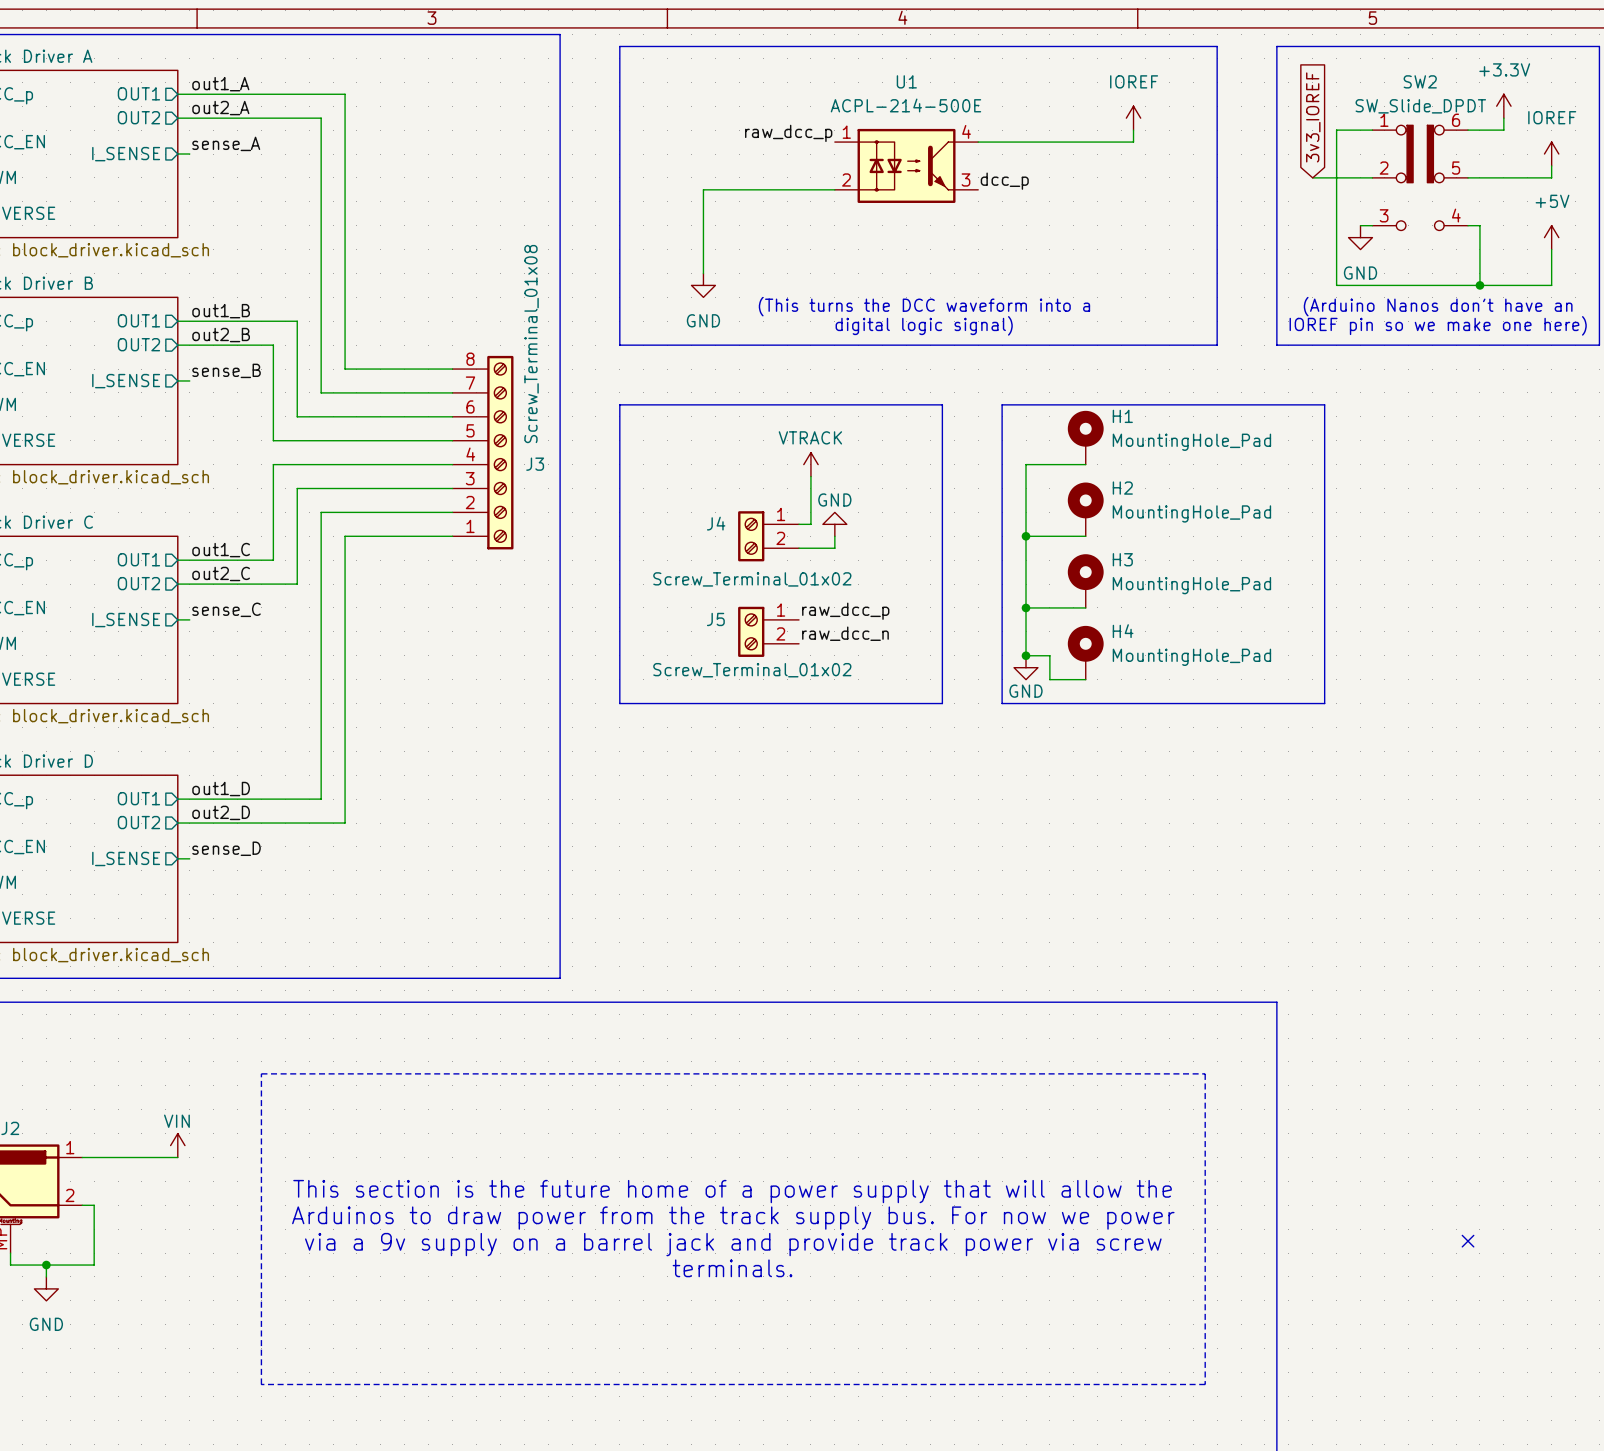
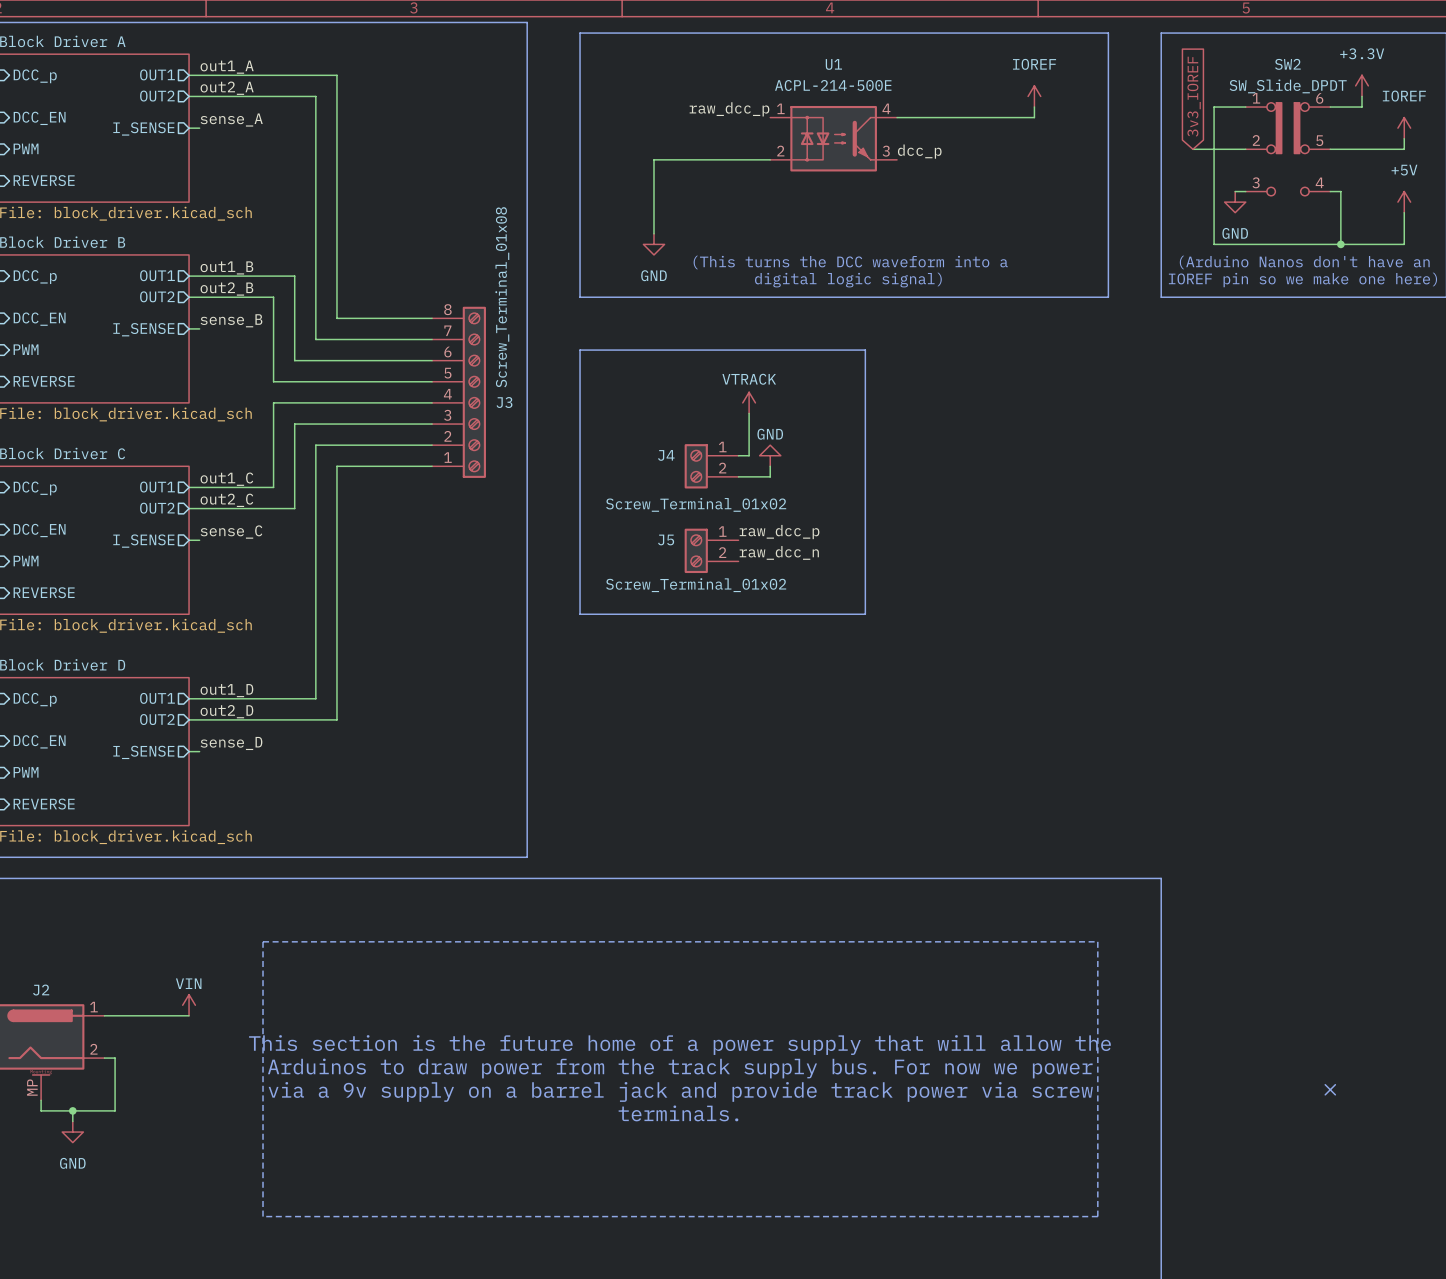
line: (1002, 404) (1324, 404) (1324, 703) (1002, 703) (1002, 404) -> none
H1: MountingHole_Pad (1085, 437) -> none
wire: (1085, 464) (1026, 464) (1026, 655) (1049, 655) (1049, 679) (1085, 679) -> none
H2: MountingHole_Pad (1085, 509) -> none
wire: (1026, 536) (1085, 536) -> none
junction: (1026, 536) -> none
H3: MountingHole_Pad (1085, 581) -> none
wire: (1026, 607) (1085, 607) -> none
junction: (1026, 607) -> none
H4: MountingHole_Pad (1085, 652) -> none
junction: (1026, 655) -> none
power symbol: GND (1026, 667) -> none

